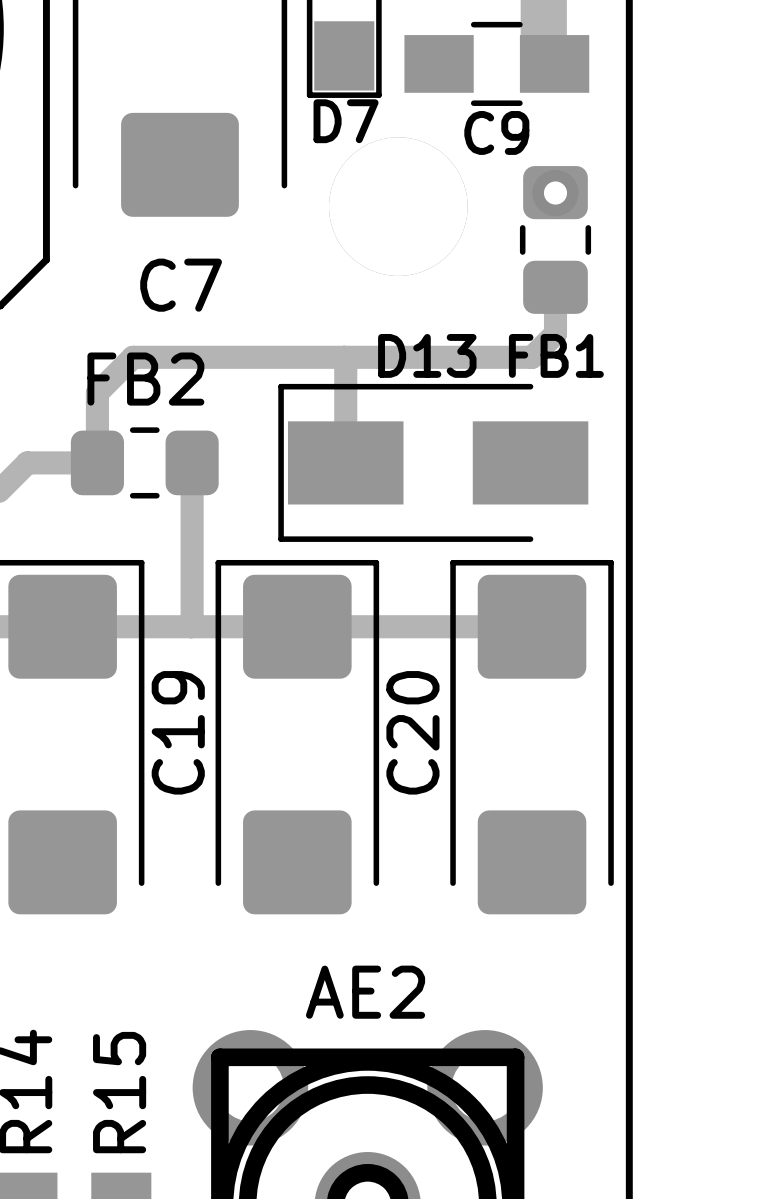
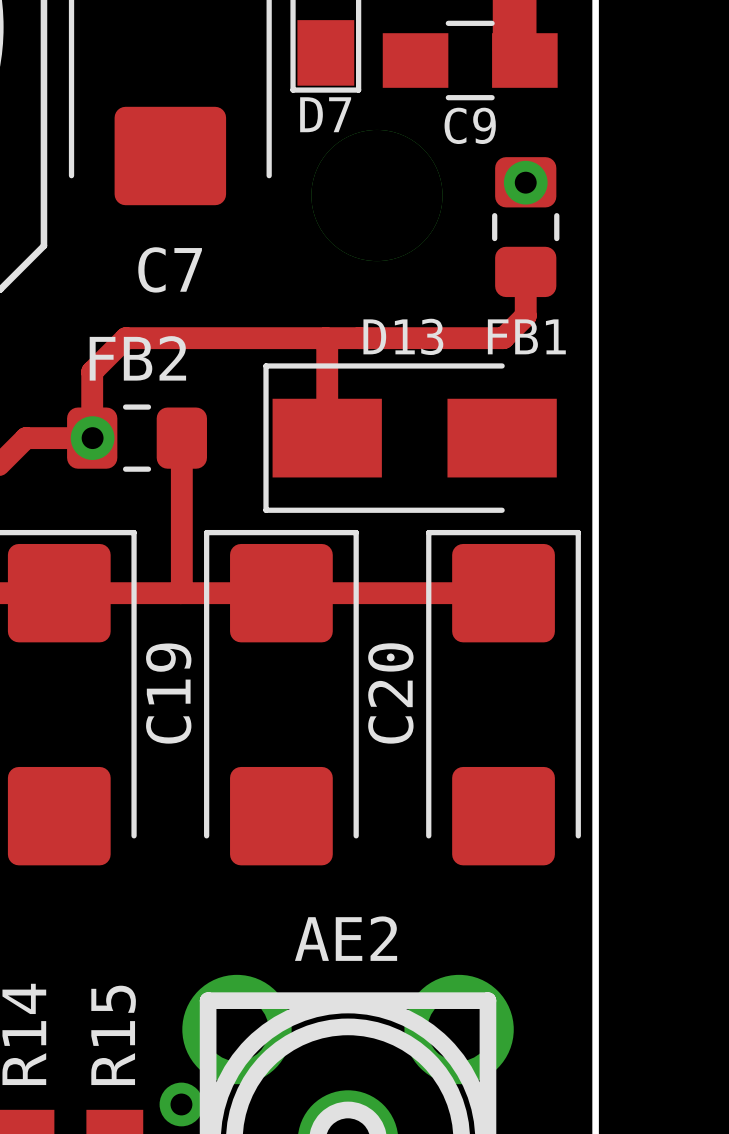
via: none -> (92, 438)
via: none -> (181, 1104)

